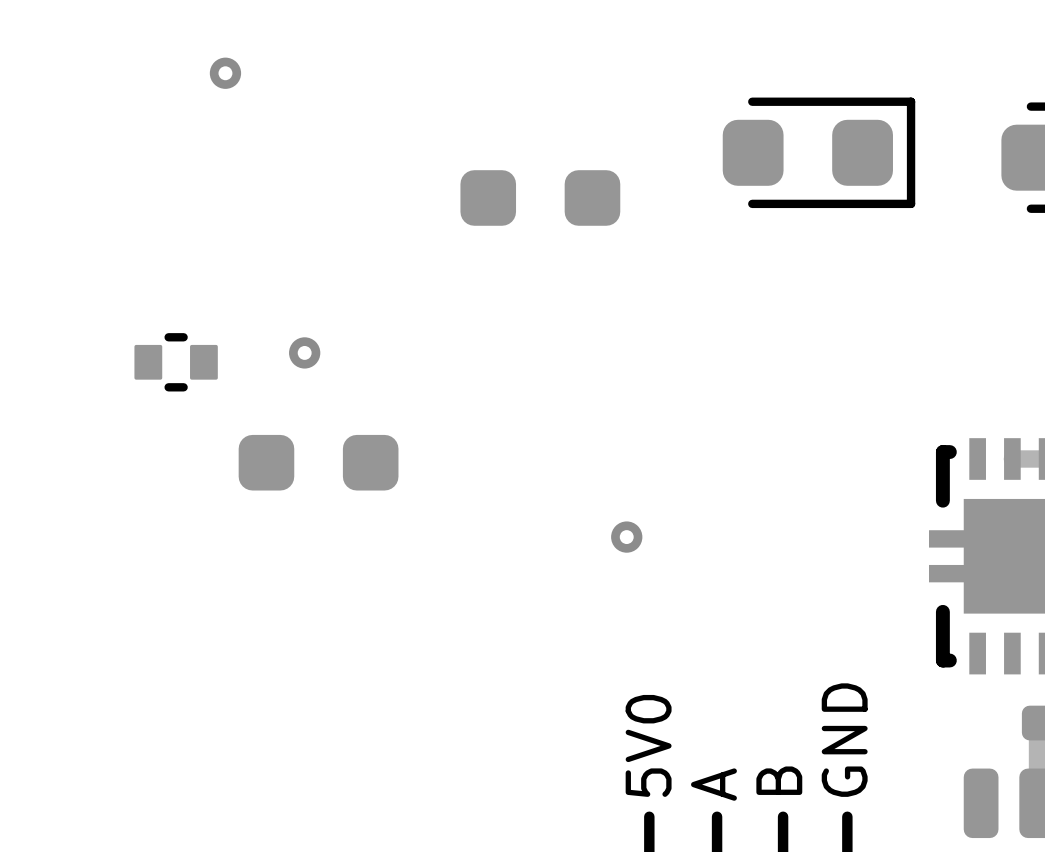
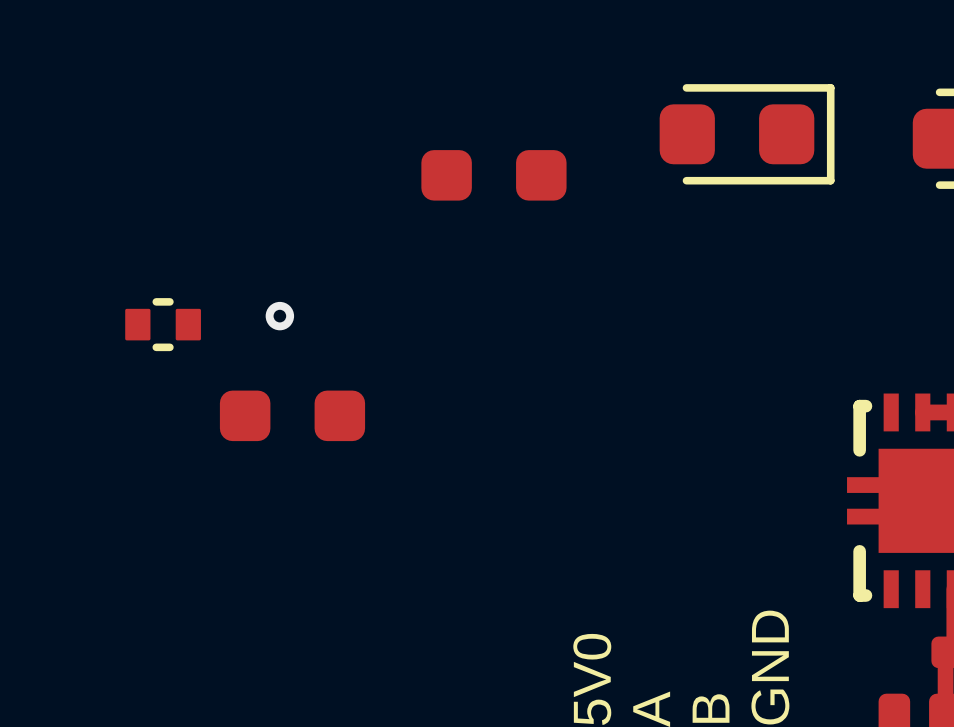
via: (225, 73) -> none
via: (626, 537) -> none

